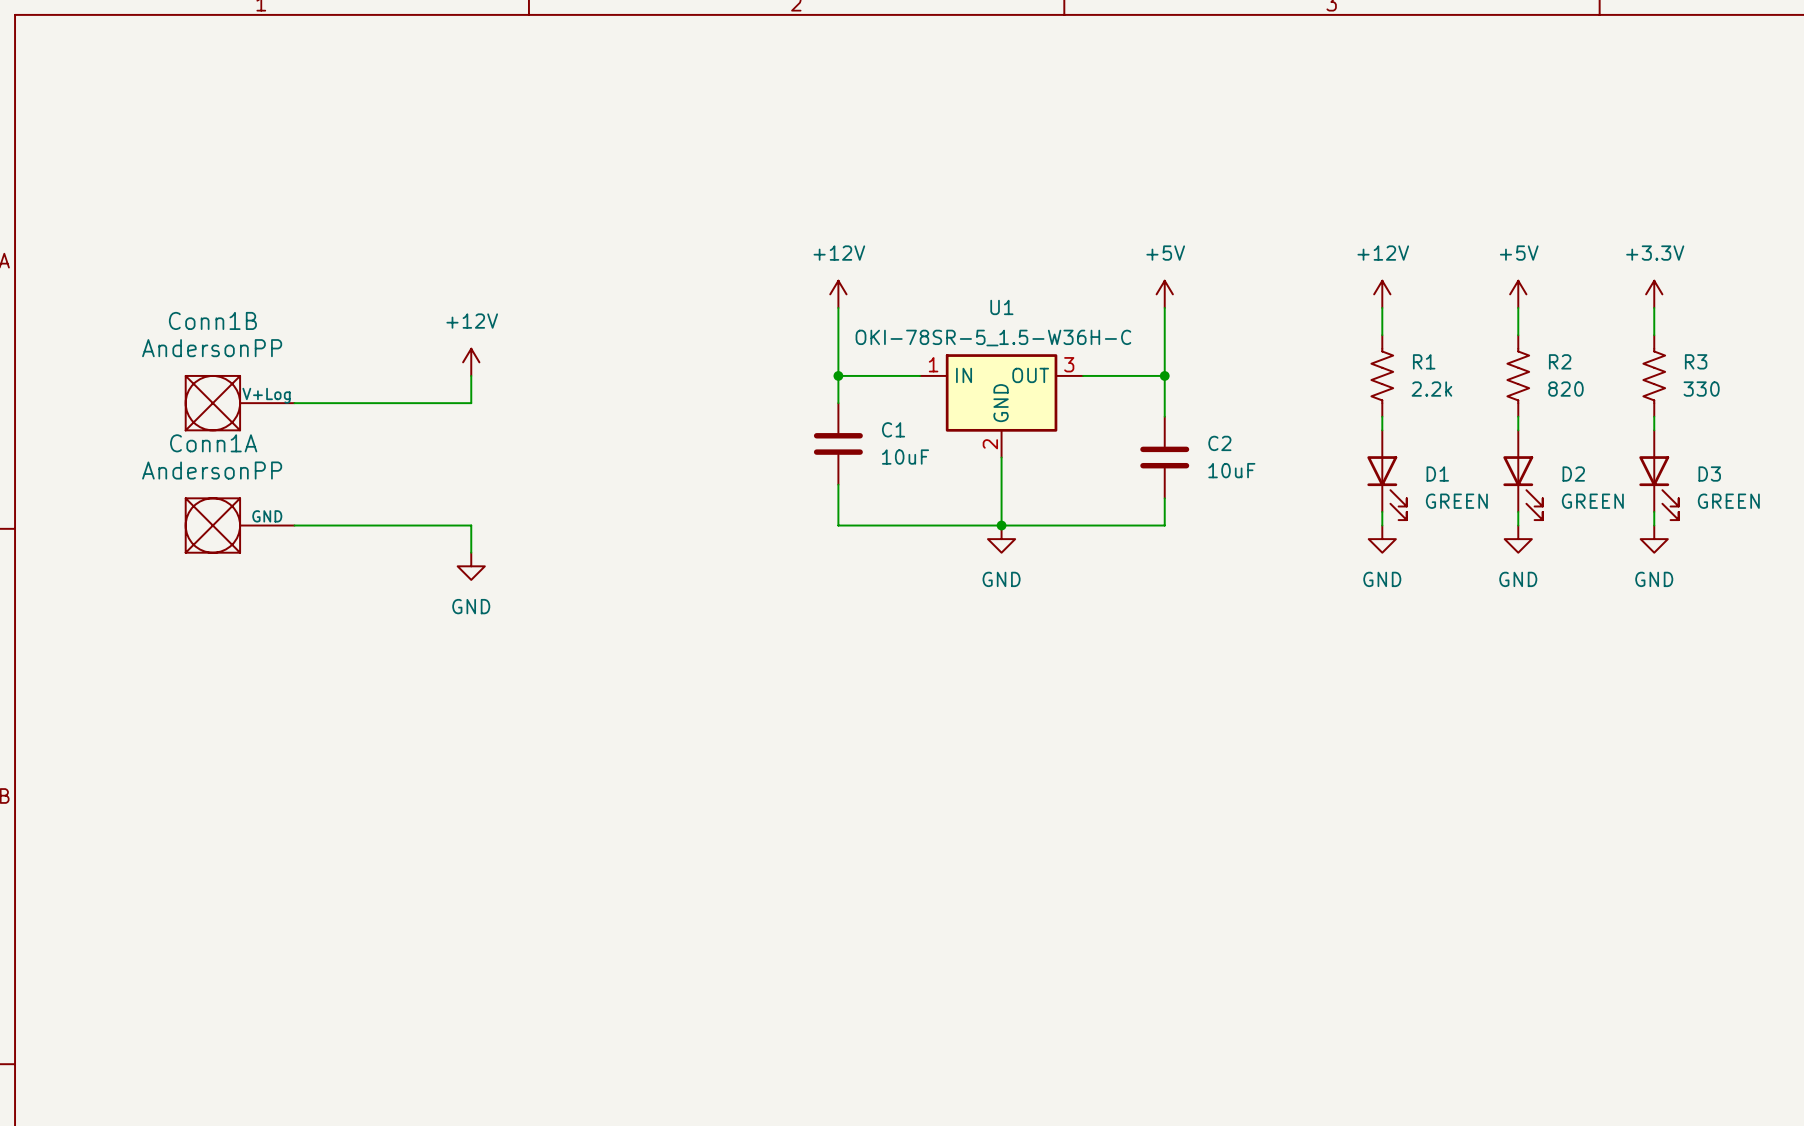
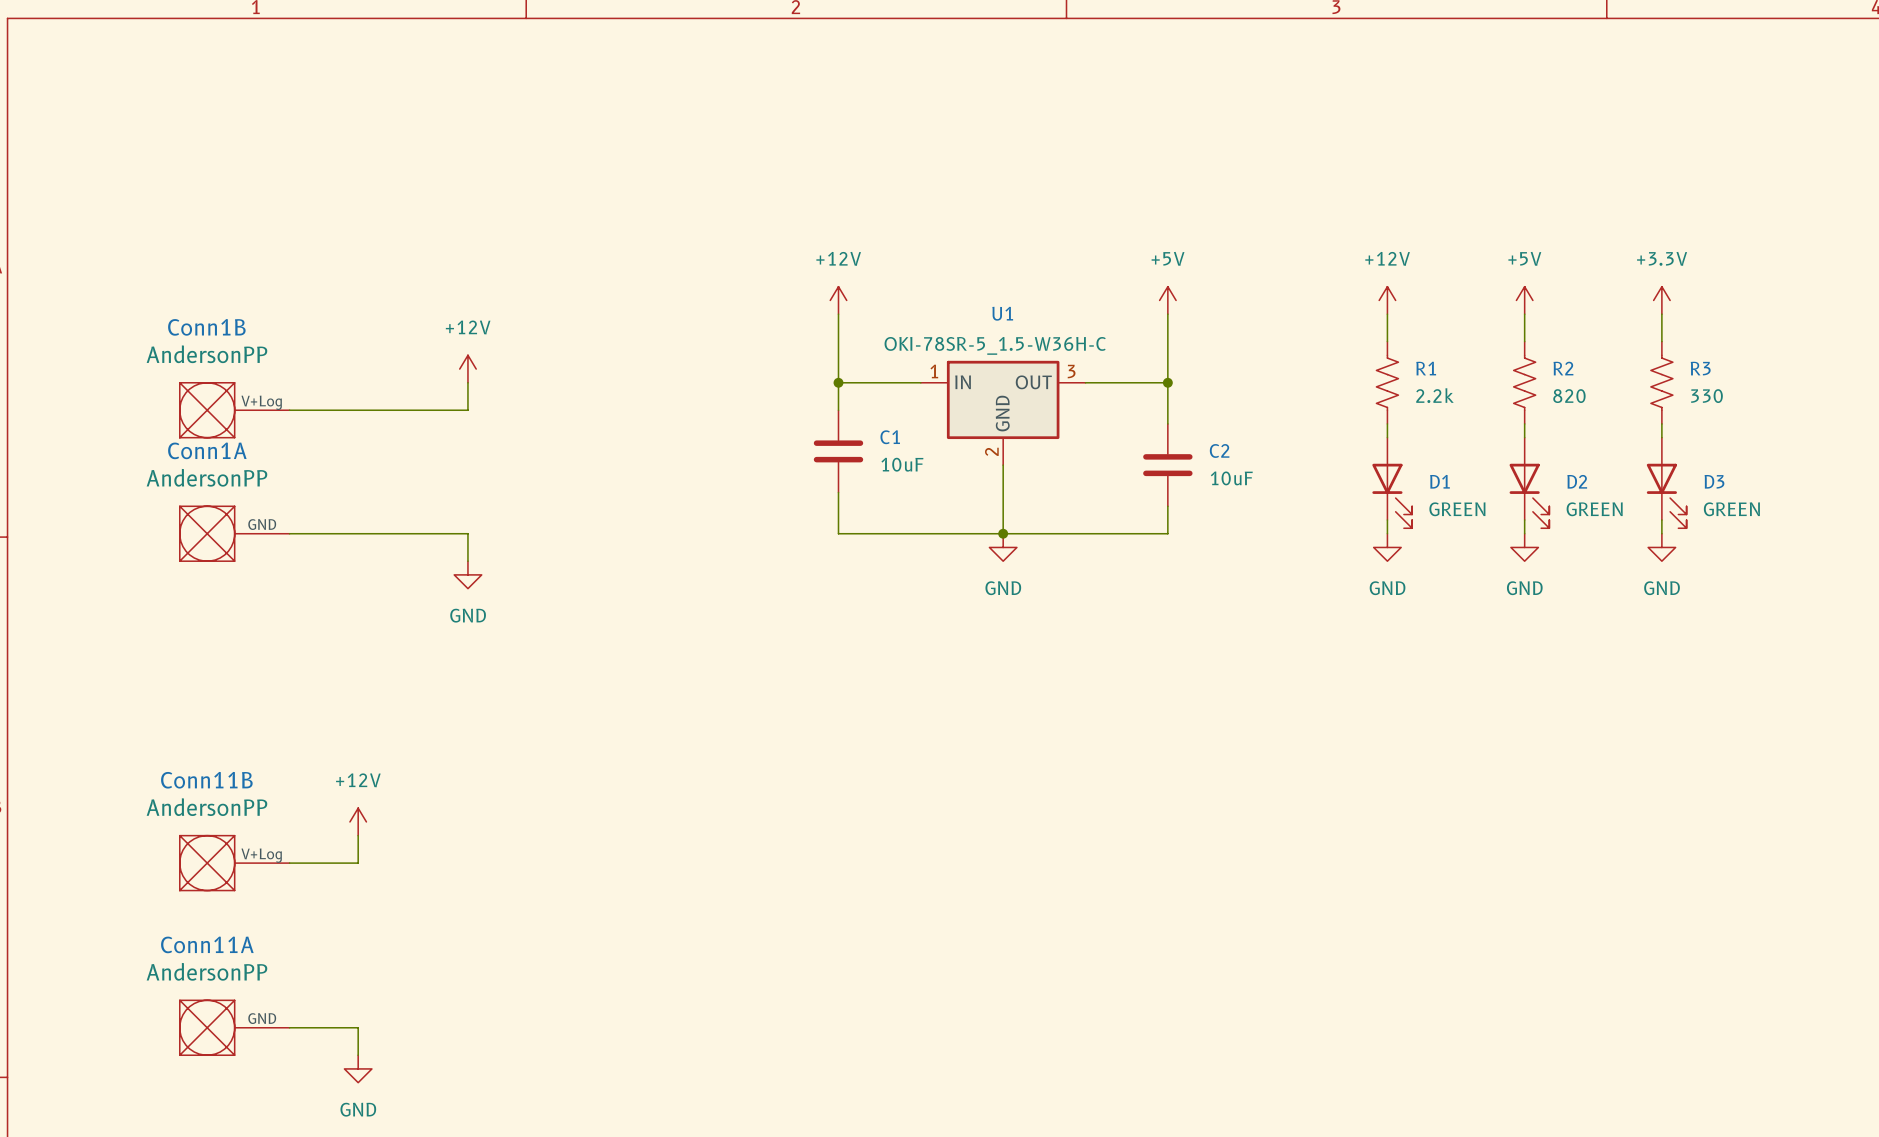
power symbol: none -> +12V (358, 821)
wire: none -> (358, 835) (358, 863) (289, 863)
Conn11B: none -> AndersonPP (234, 863)
Conn11A: none -> AndersonPP (234, 1027)
wire: none -> (289, 1027) (358, 1027) (358, 1055)
power symbol: none -> GND (358, 1068)

